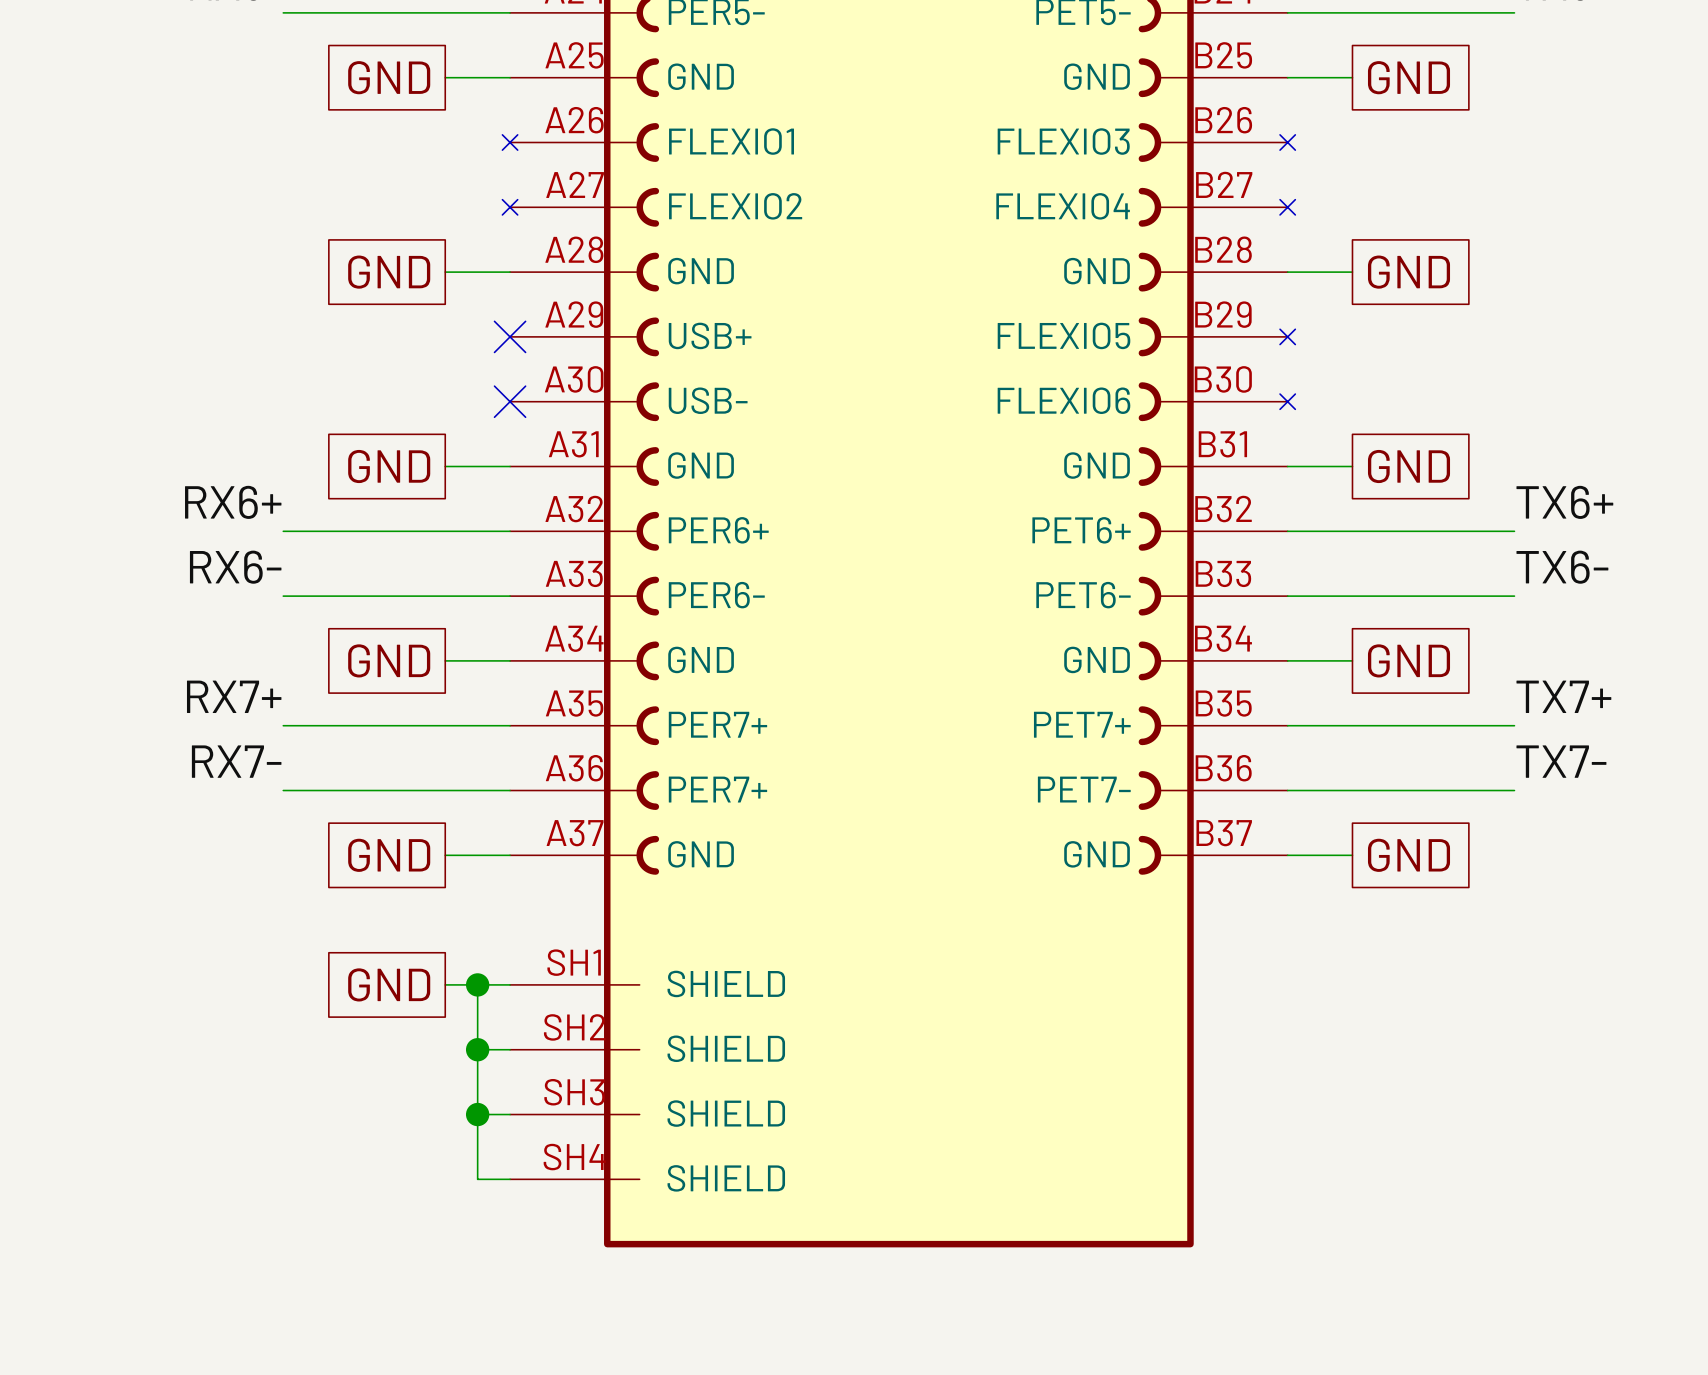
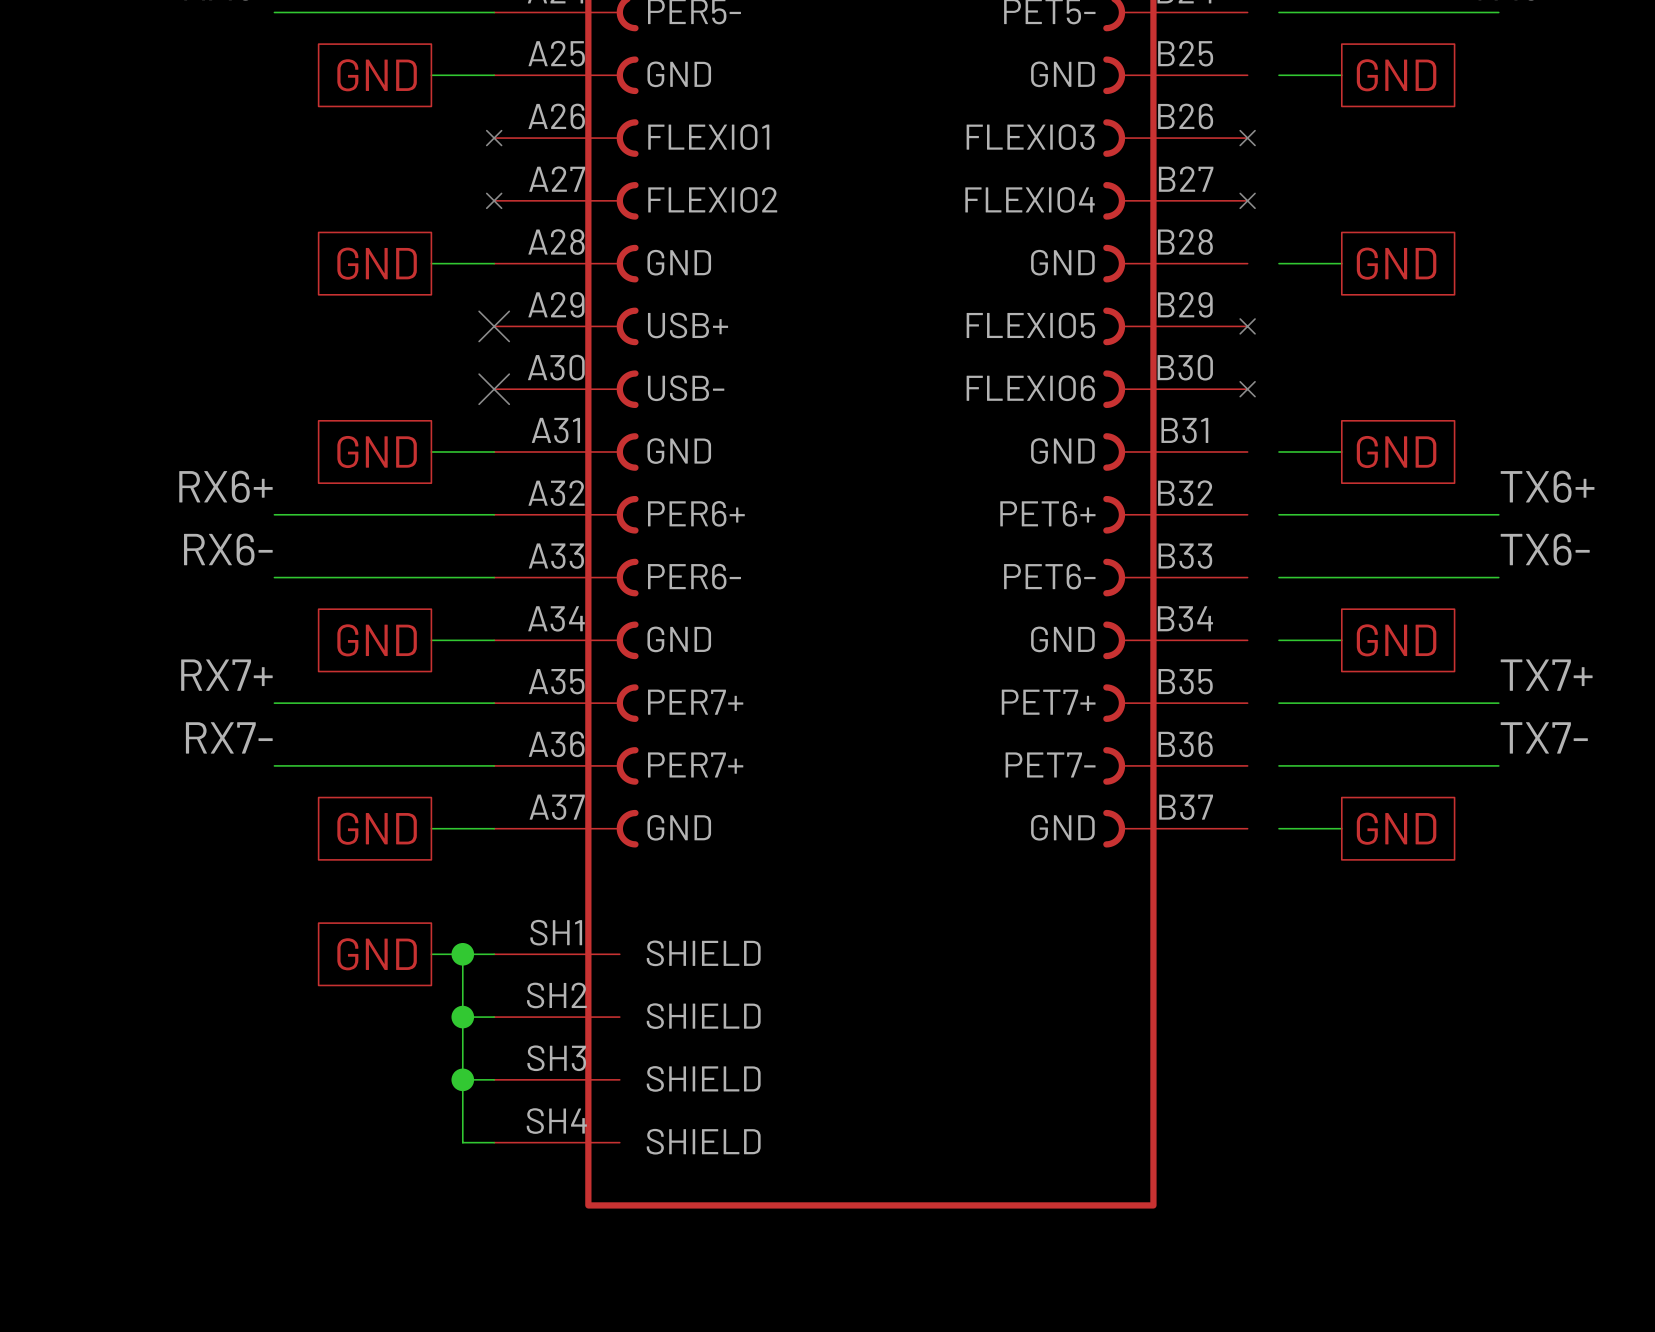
wire: (1287, 12) (1320, 12) -> (1467, 12) (1498, 12)
wire: (1287, 77) (1320, 77) -> (1310, 75) (1341, 75)
global label position: GND (1409, 77) -> GND (1396, 75)
wire: (1287, 272) (1320, 272) -> (1310, 263) (1341, 263)
global label position: GND (1409, 272) -> GND (1396, 263)
wire: (1287, 466) (1320, 466) -> (1310, 451) (1341, 451)
global label position: GND (1409, 466) -> GND (1396, 451)
label position: TX6+ (1564, 502) -> TX6+ (1547, 486)
wire: (1287, 531) (1320, 531) -> (1467, 514) (1498, 514)
label position: TX6- (1562, 567) -> TX6- (1545, 549)
wire: (1287, 596) (1320, 596) -> (1467, 577) (1498, 577)
wire: (1287, 660) (1320, 660) -> (1310, 640) (1341, 640)
global label position: GND (1409, 660) -> GND (1396, 640)
label position: TX7+ (1563, 696) -> TX7+ (1546, 675)
wire: (1287, 725) (1320, 725) -> (1467, 703) (1498, 703)
label position: TX7- (1561, 761) -> TX7- (1544, 737)
wire: (1287, 790) (1320, 790) -> (1467, 765) (1498, 765)
wire: (1287, 855) (1320, 855) -> (1310, 828) (1341, 828)
global label position: GND (1409, 855) -> GND (1396, 828)

